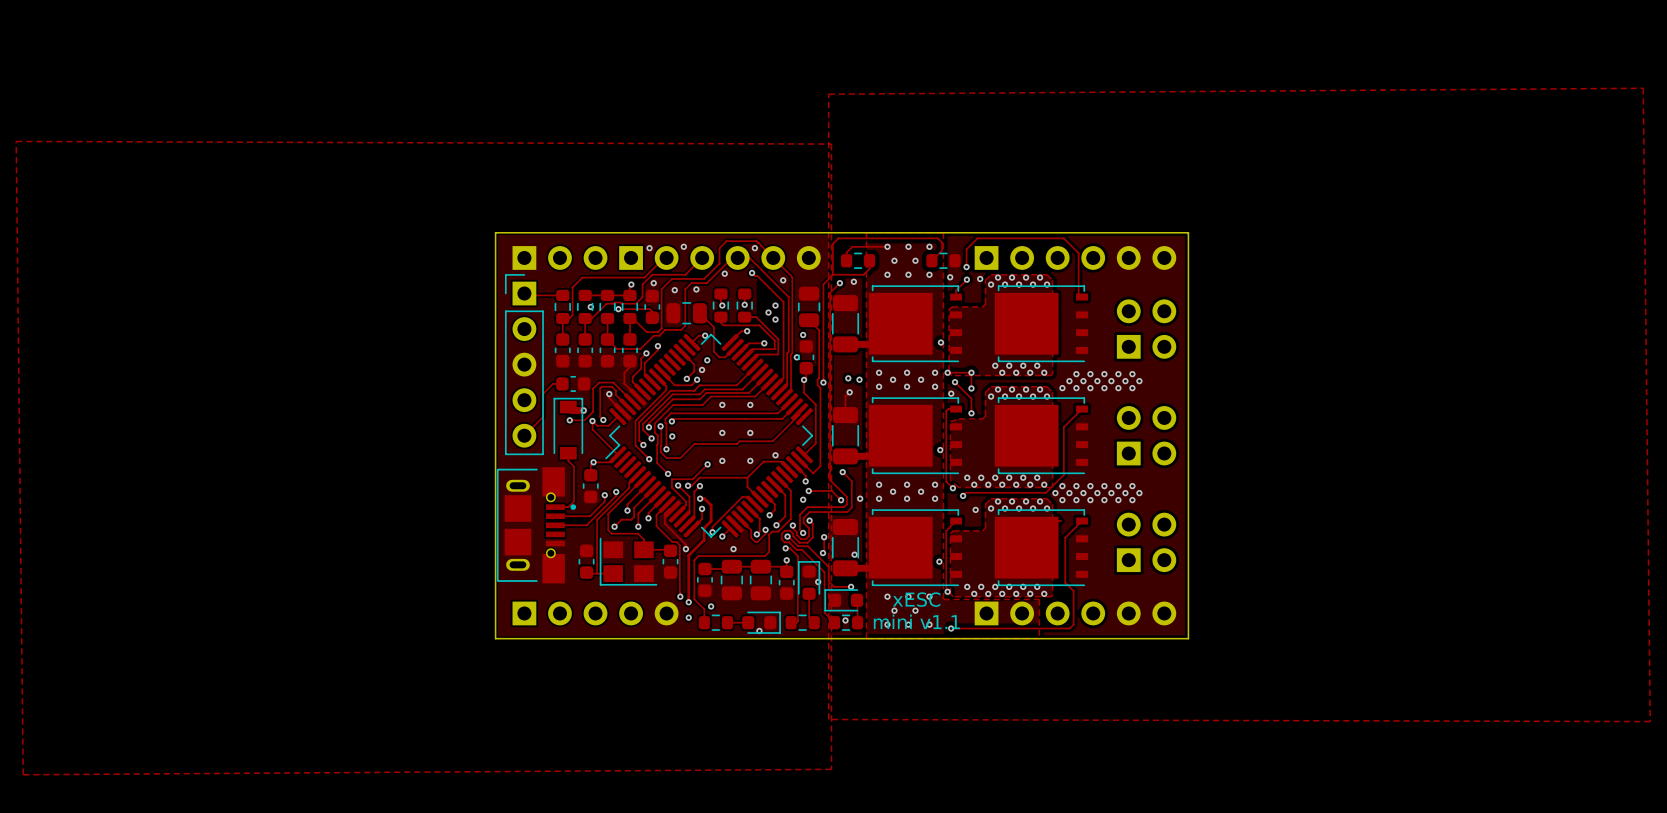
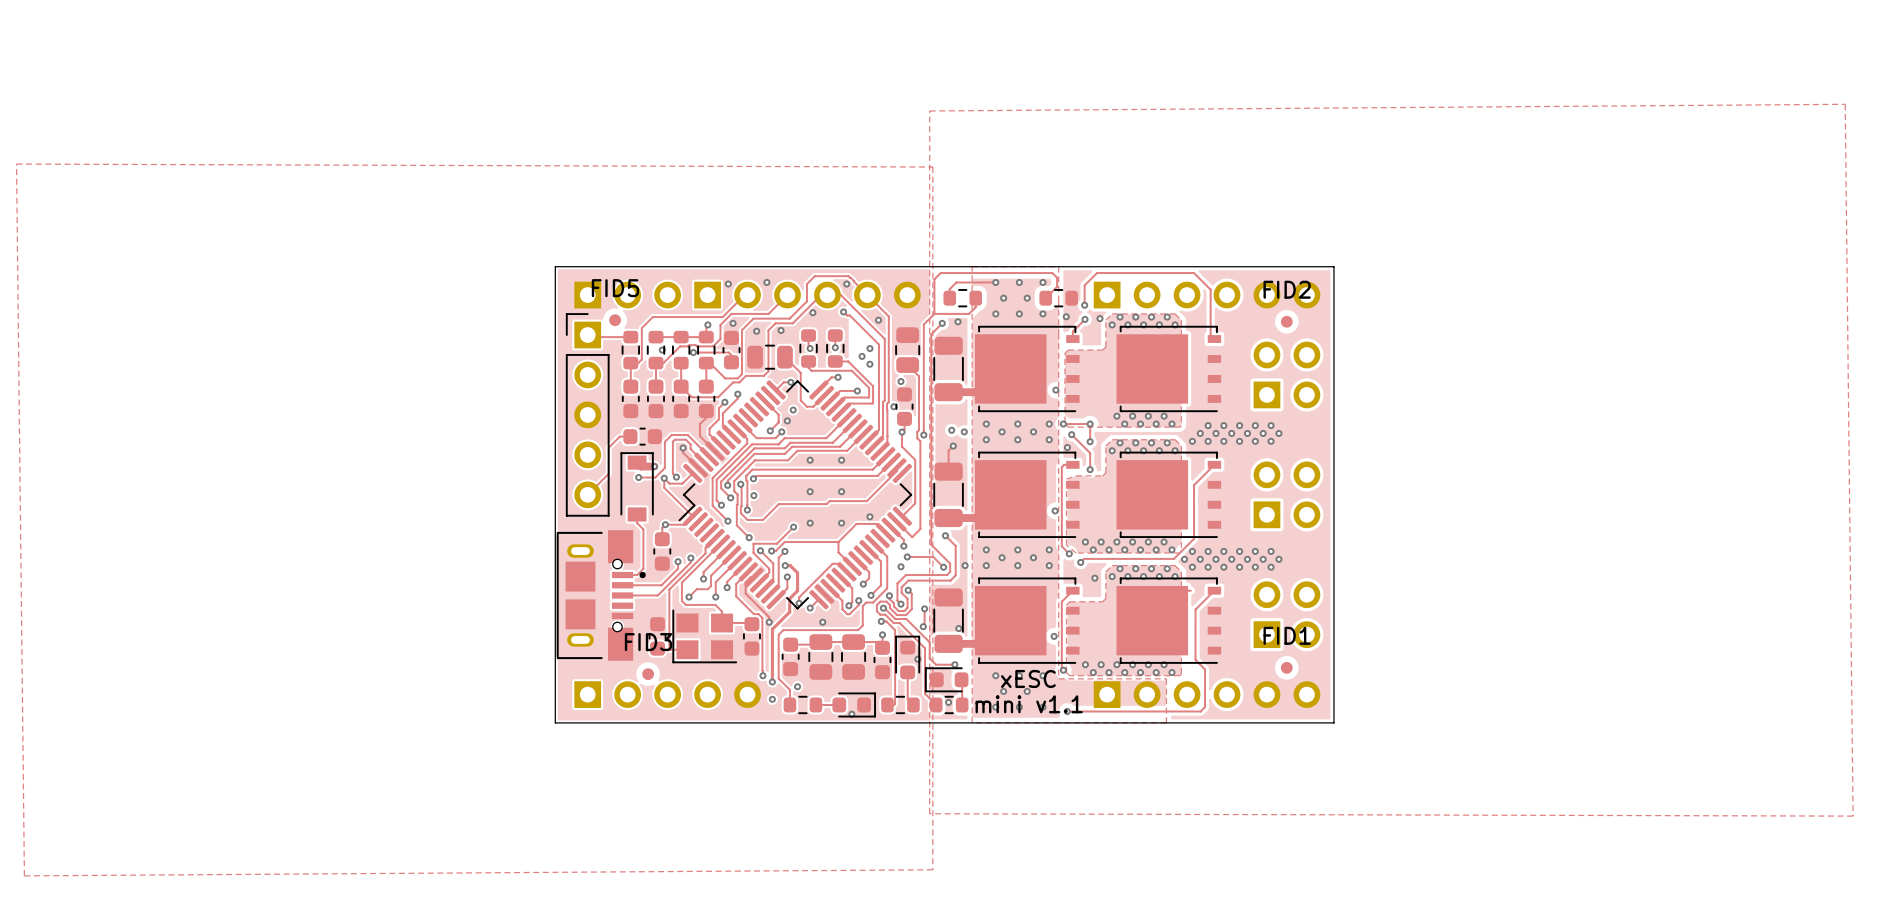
FID5: none -> (615, 320)
FID2: none -> (1286, 321)
FID1: none -> (1286, 667)
FID3: none -> (648, 674)

